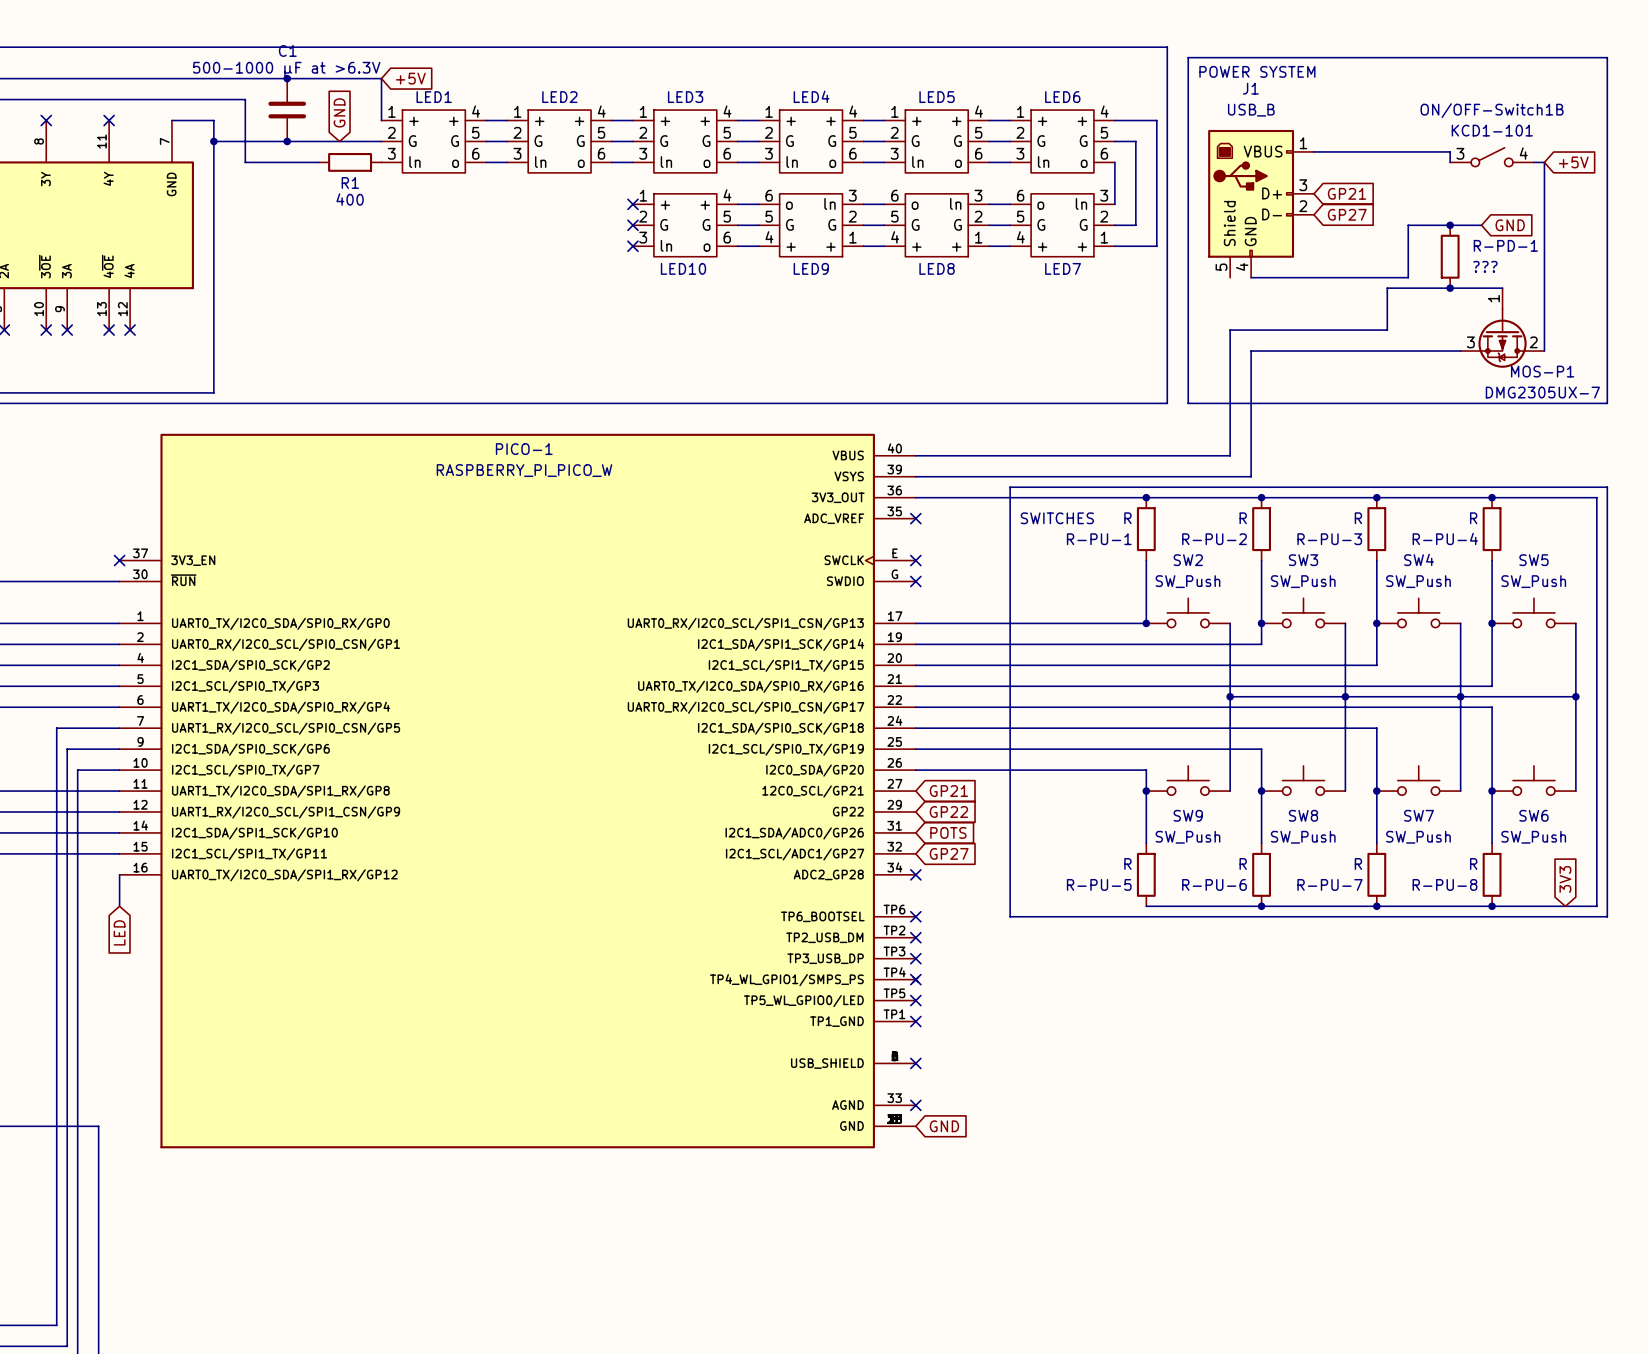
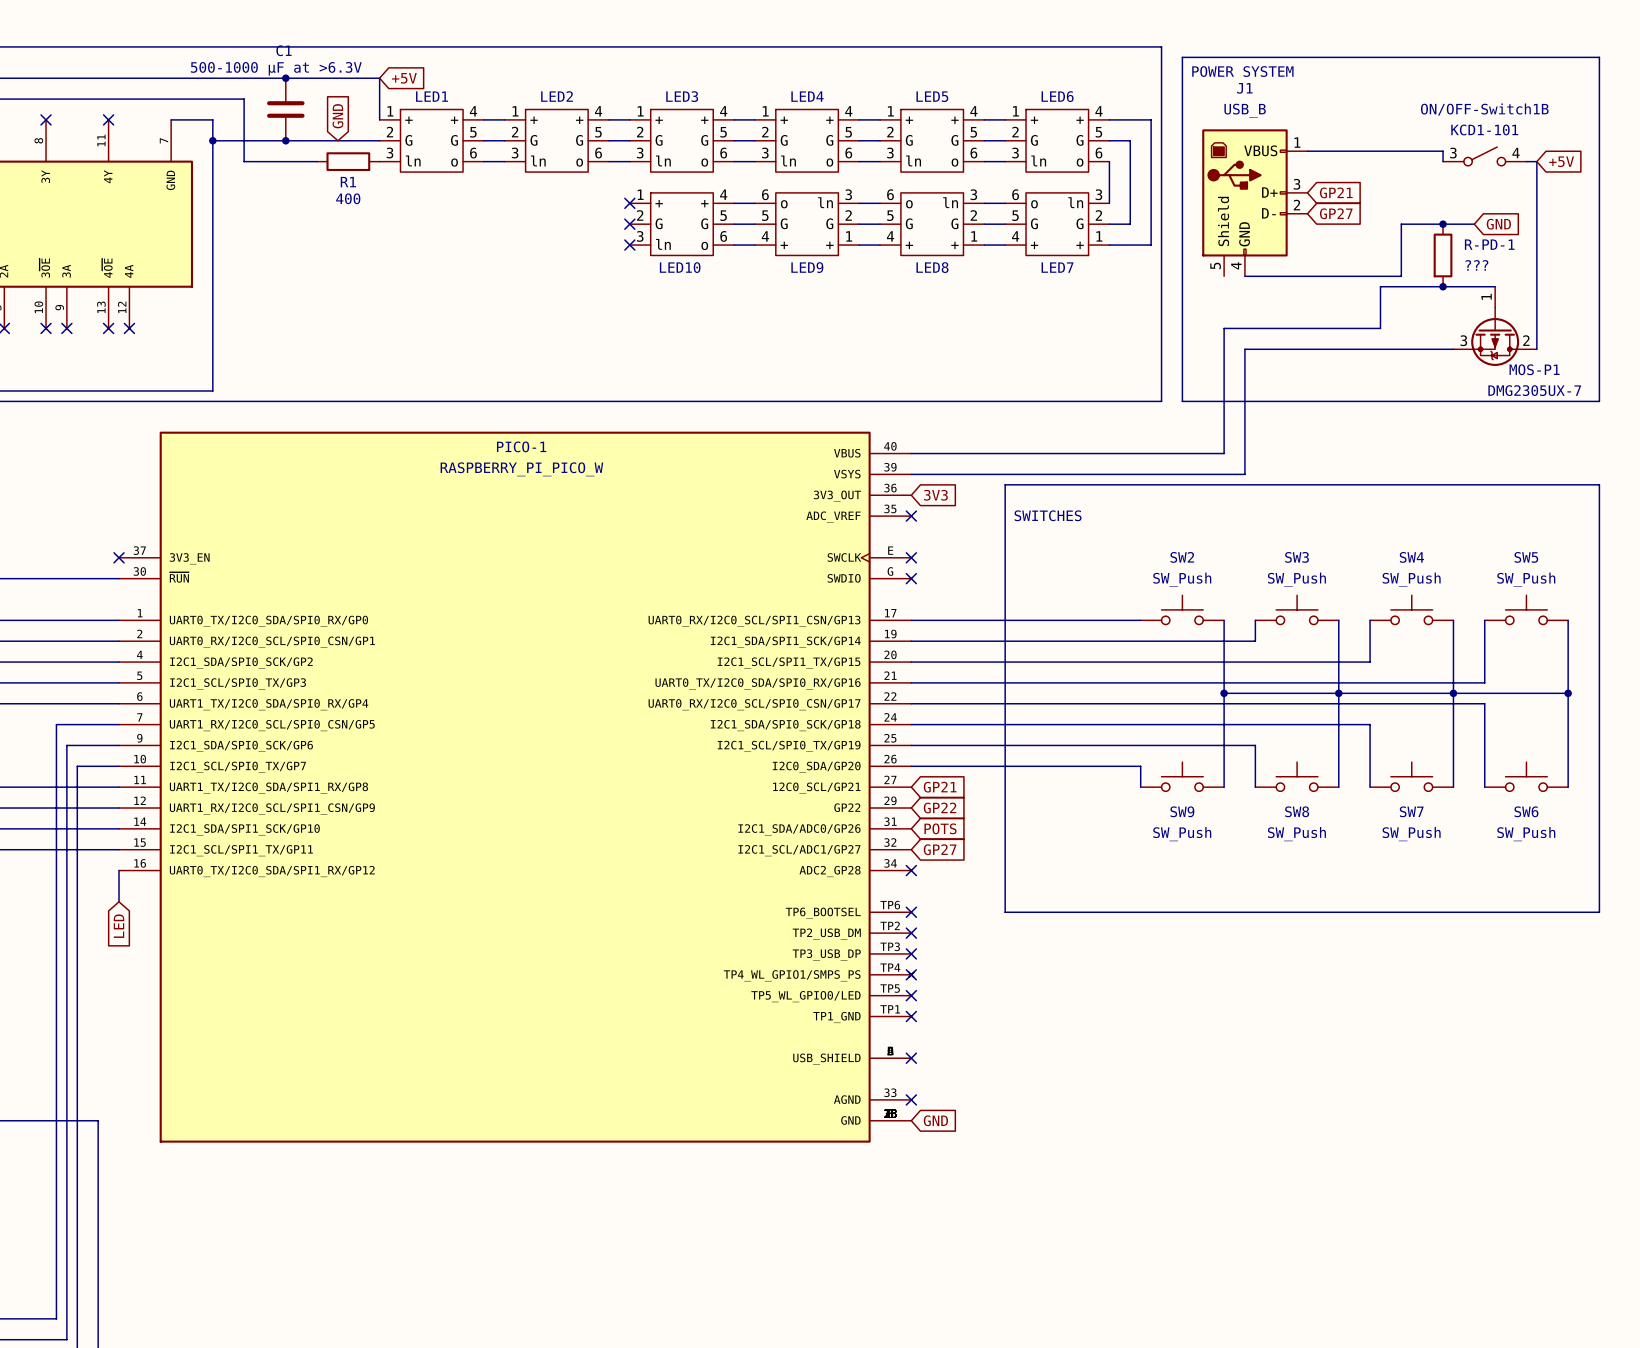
wire: (915, 497) (1596, 497) (1596, 906) (1146, 906) -> none
global label: none -> 3V3 (935, 495)
junction: (1146, 497) -> none
junction: (1261, 497) -> none
junction: (1376, 497) -> none
junction: (1492, 497) -> none
R-PU-1: R (1146, 529) -> none
R-PU-2: R (1261, 529) -> none
R-PU-3: R (1376, 529) -> none
R-PU-4: R (1492, 529) -> none
wire: (1146, 560) (1146, 623) -> none
wire: (1261, 560) (1261, 623) -> none
wire: (1376, 560) (1376, 623) -> none
wire: (1492, 560) (1492, 623) -> none
junction: (1146, 623) -> none
junction: (1261, 623) -> none
junction: (1376, 623) -> none
junction: (1492, 623) -> none
wire: (1146, 791) (1146, 843) -> none
junction: (1146, 791) -> none
wire: (1261, 791) (1261, 843) -> none
junction: (1261, 791) -> none
wire: (1376, 791) (1376, 843) -> none
junction: (1376, 791) -> none
wire: (1492, 791) (1492, 843) -> none
junction: (1492, 791) -> none
R-PU-5: R (1146, 874) -> none
R-PU-6: R (1261, 874) -> none
R-PU-7: R (1376, 874) -> none
R-PU-8: R (1492, 874) -> none
global label: 3V3 (1565, 879) -> none
junction: (1261, 906) -> none
junction: (1376, 906) -> none
junction: (1492, 906) -> none

